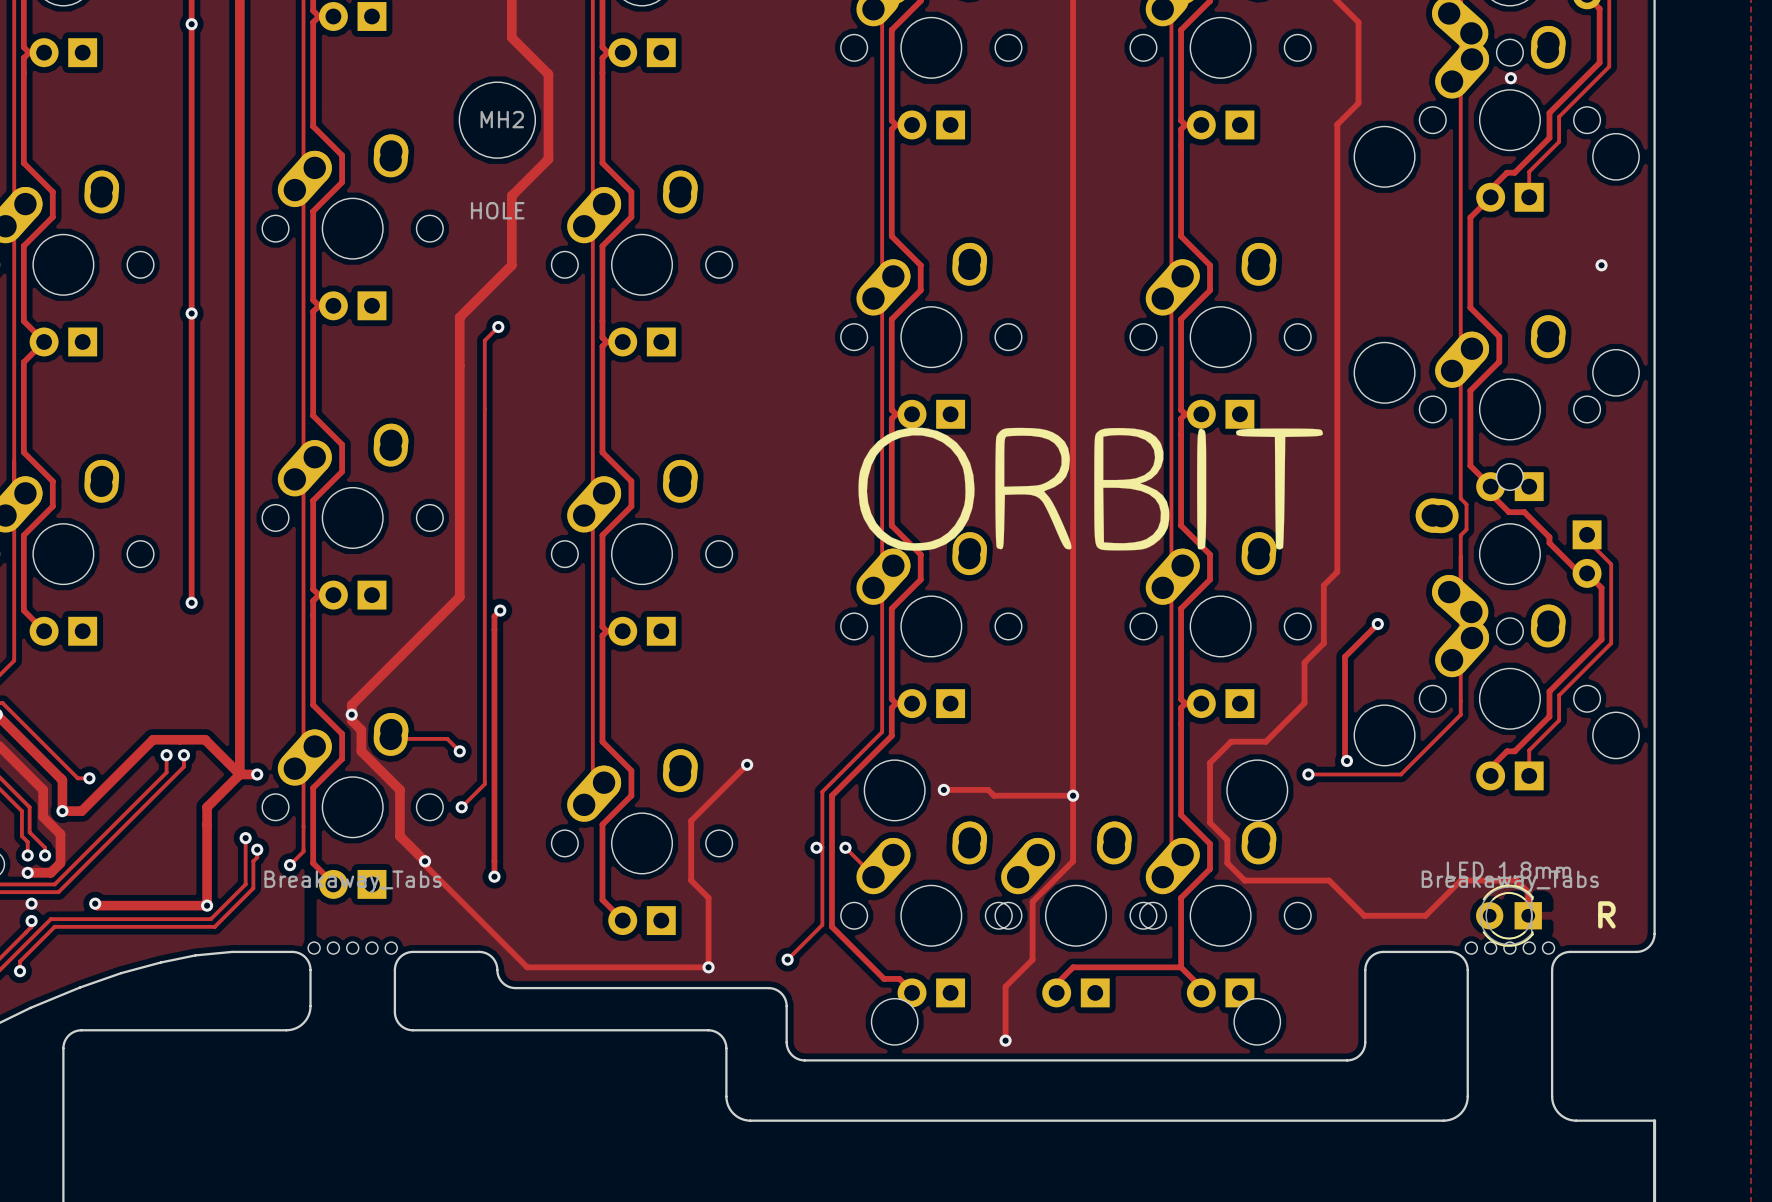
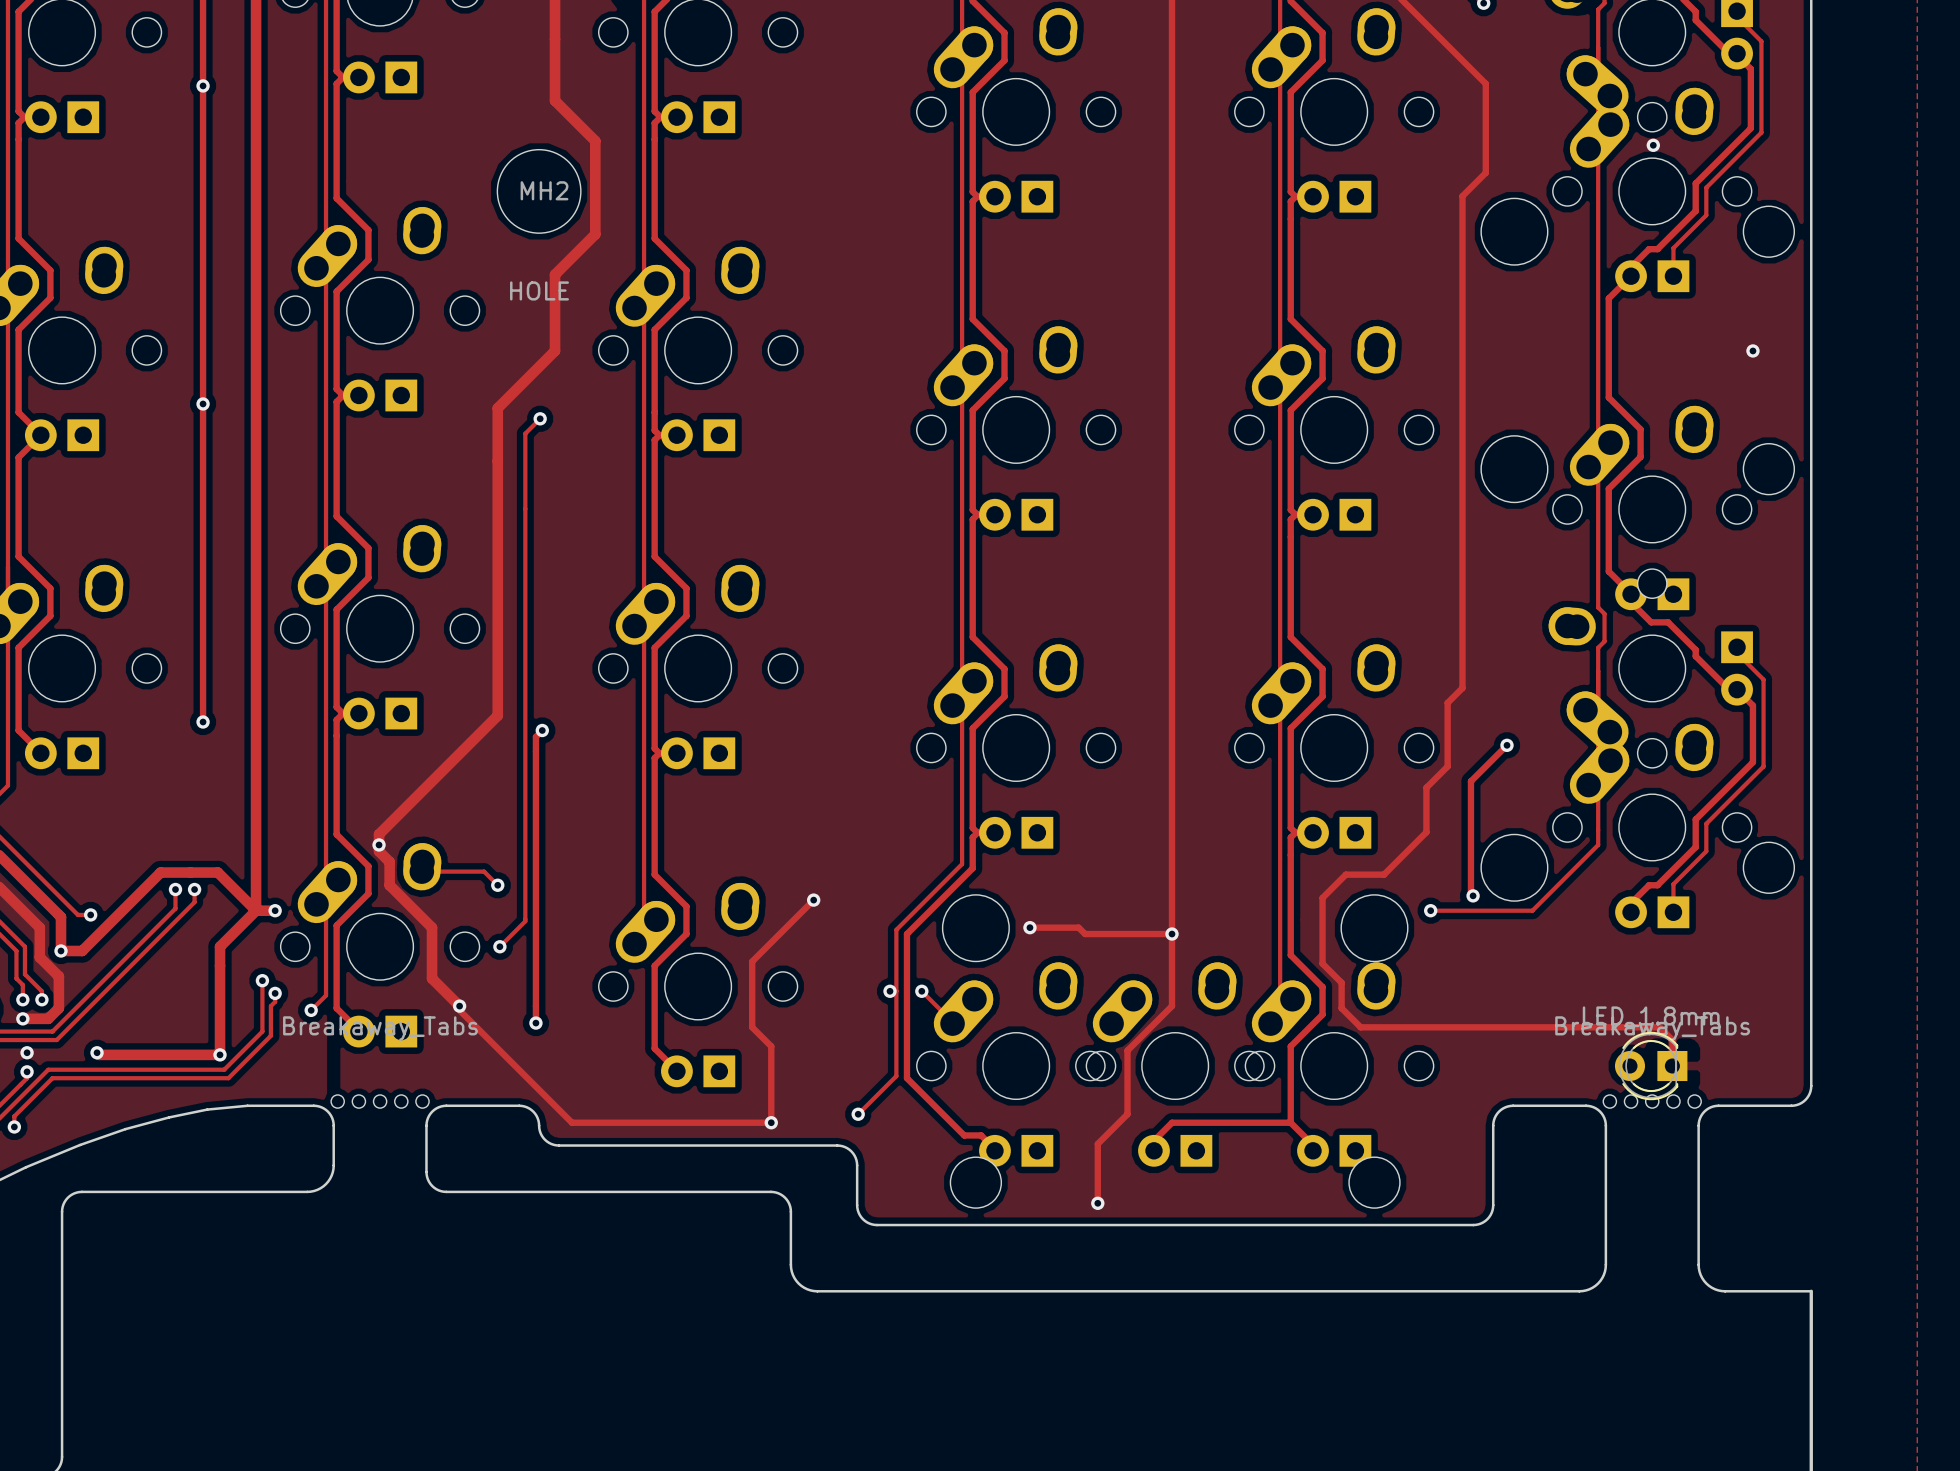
drawing: [858, 427, 1323, 551] -> none
track: (1329, 880) (1364, 915) (1425, 915) (1460, 880) -> (1453, 1027) (1598, 1027)
text: R (1606, 914) -> none

